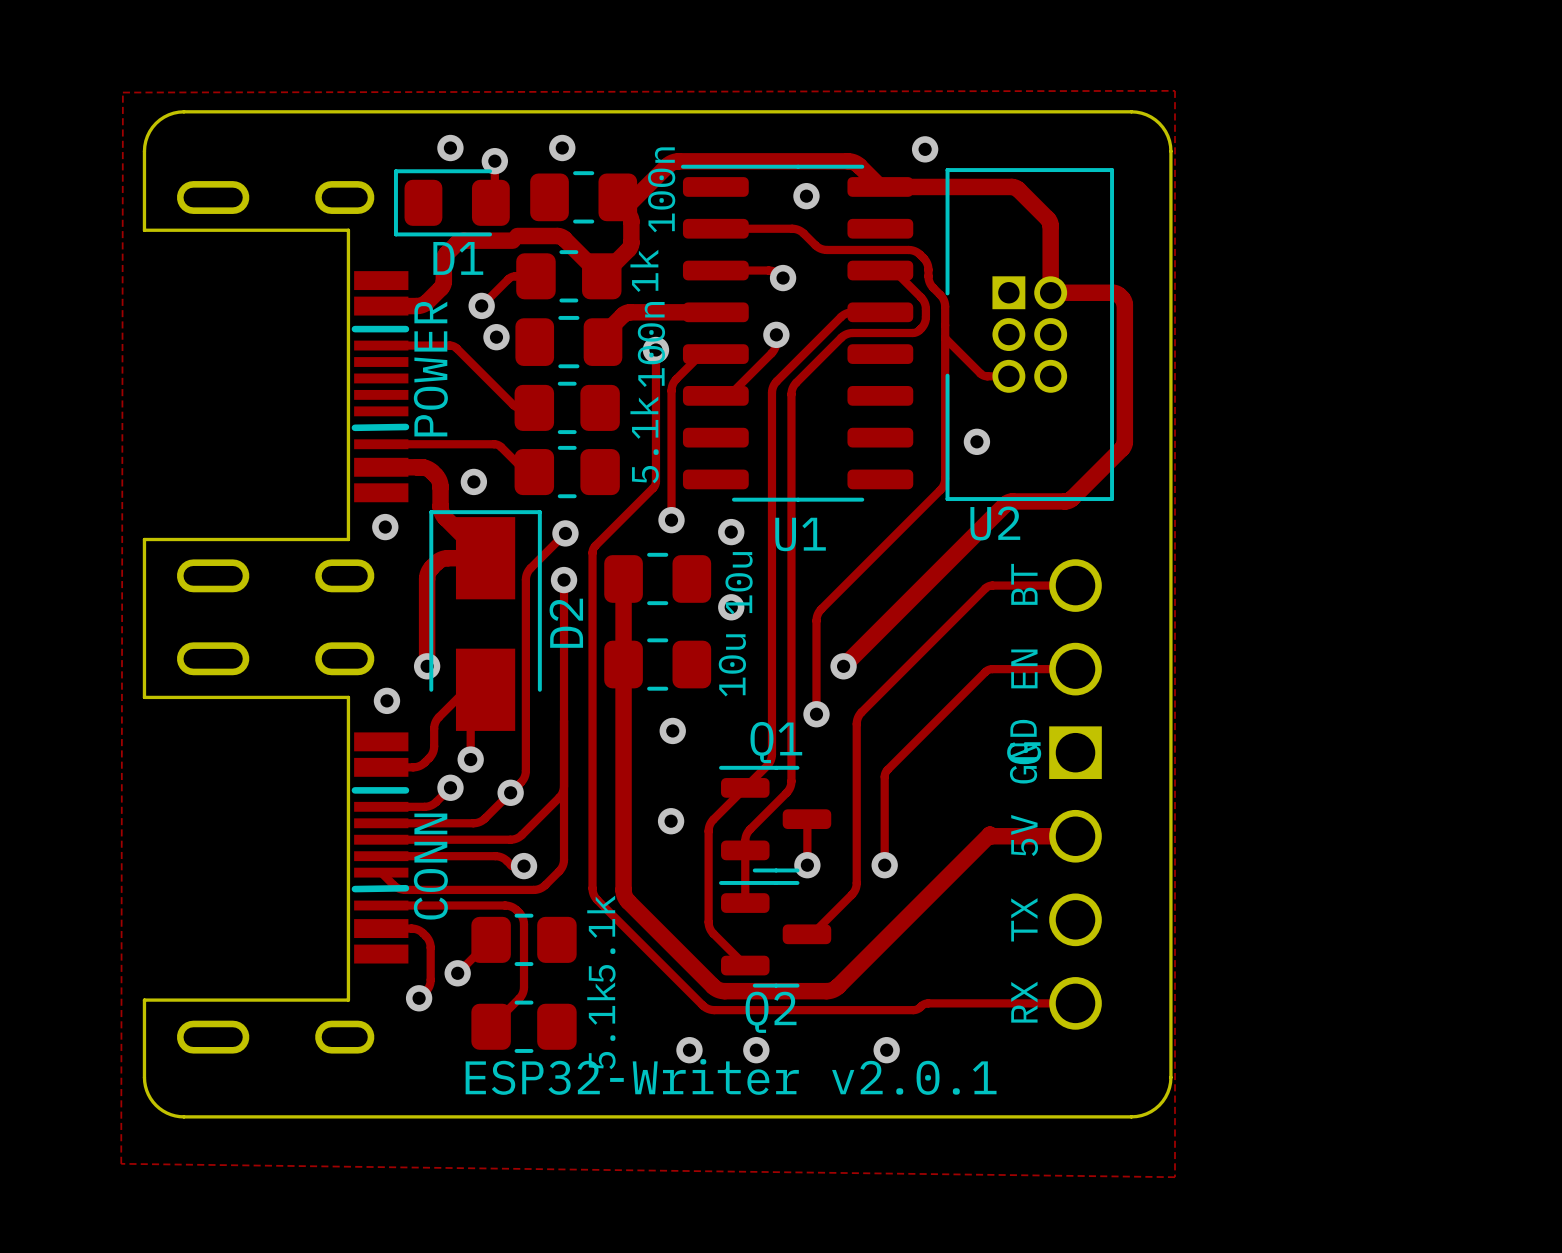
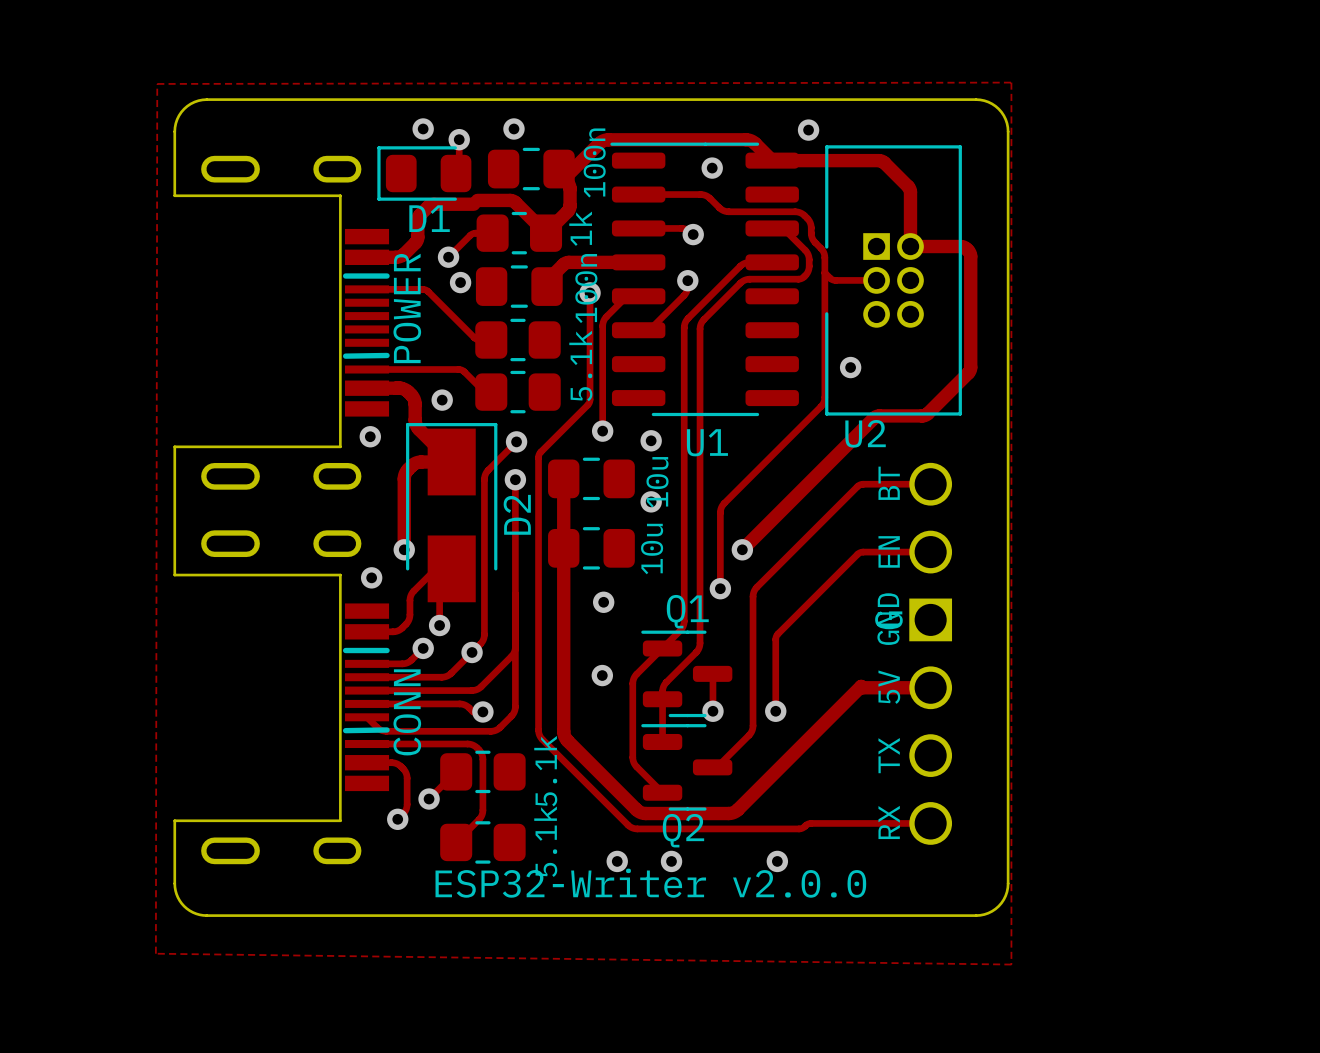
track: none -> (824, 272) (834, 280) (876, 280)
track: (945, 338) (982, 375) (1008, 376) -> none
text: ESP32-Writer v2.0.1 (731, 1076) -> ESP32-Writer v2.0.0 (650, 883)

